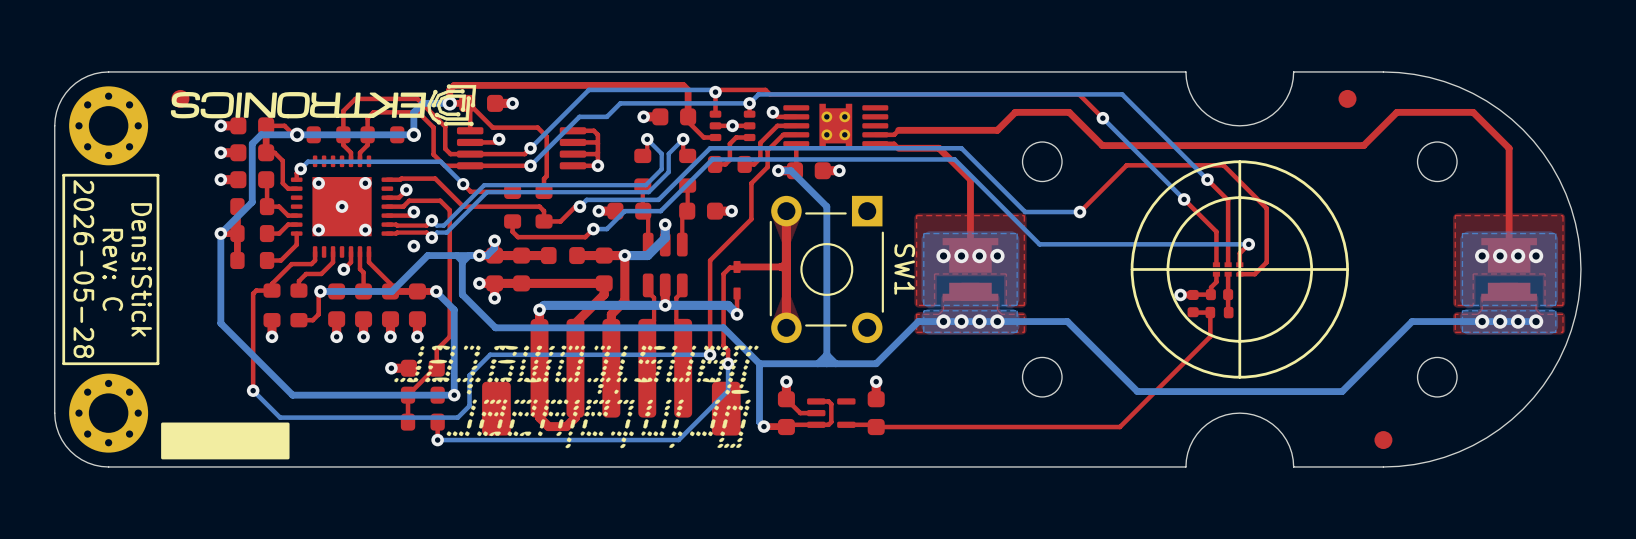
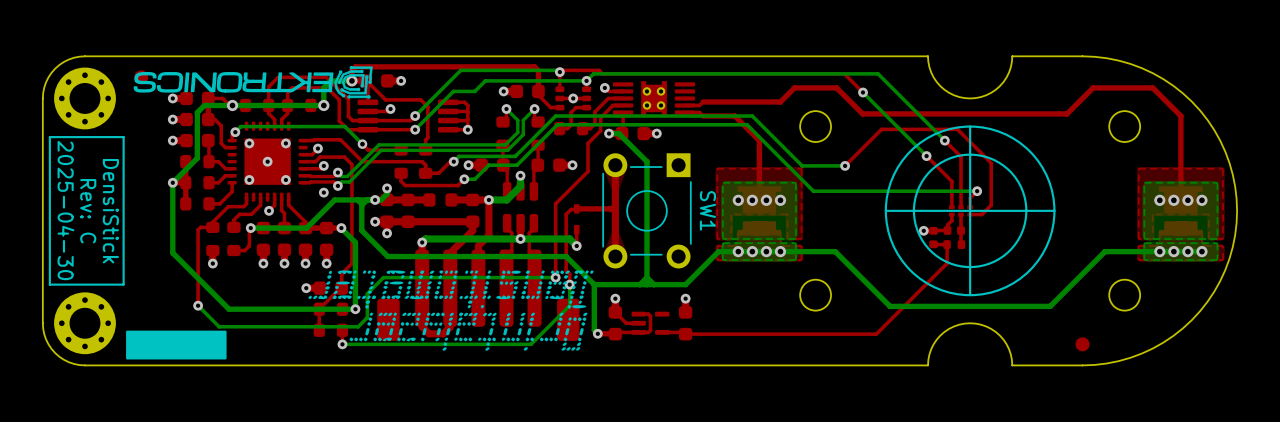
part: (1347, 98) -> none
text: 2026-05-28 (83, 269) -> 2025-04-30 (65, 210)

